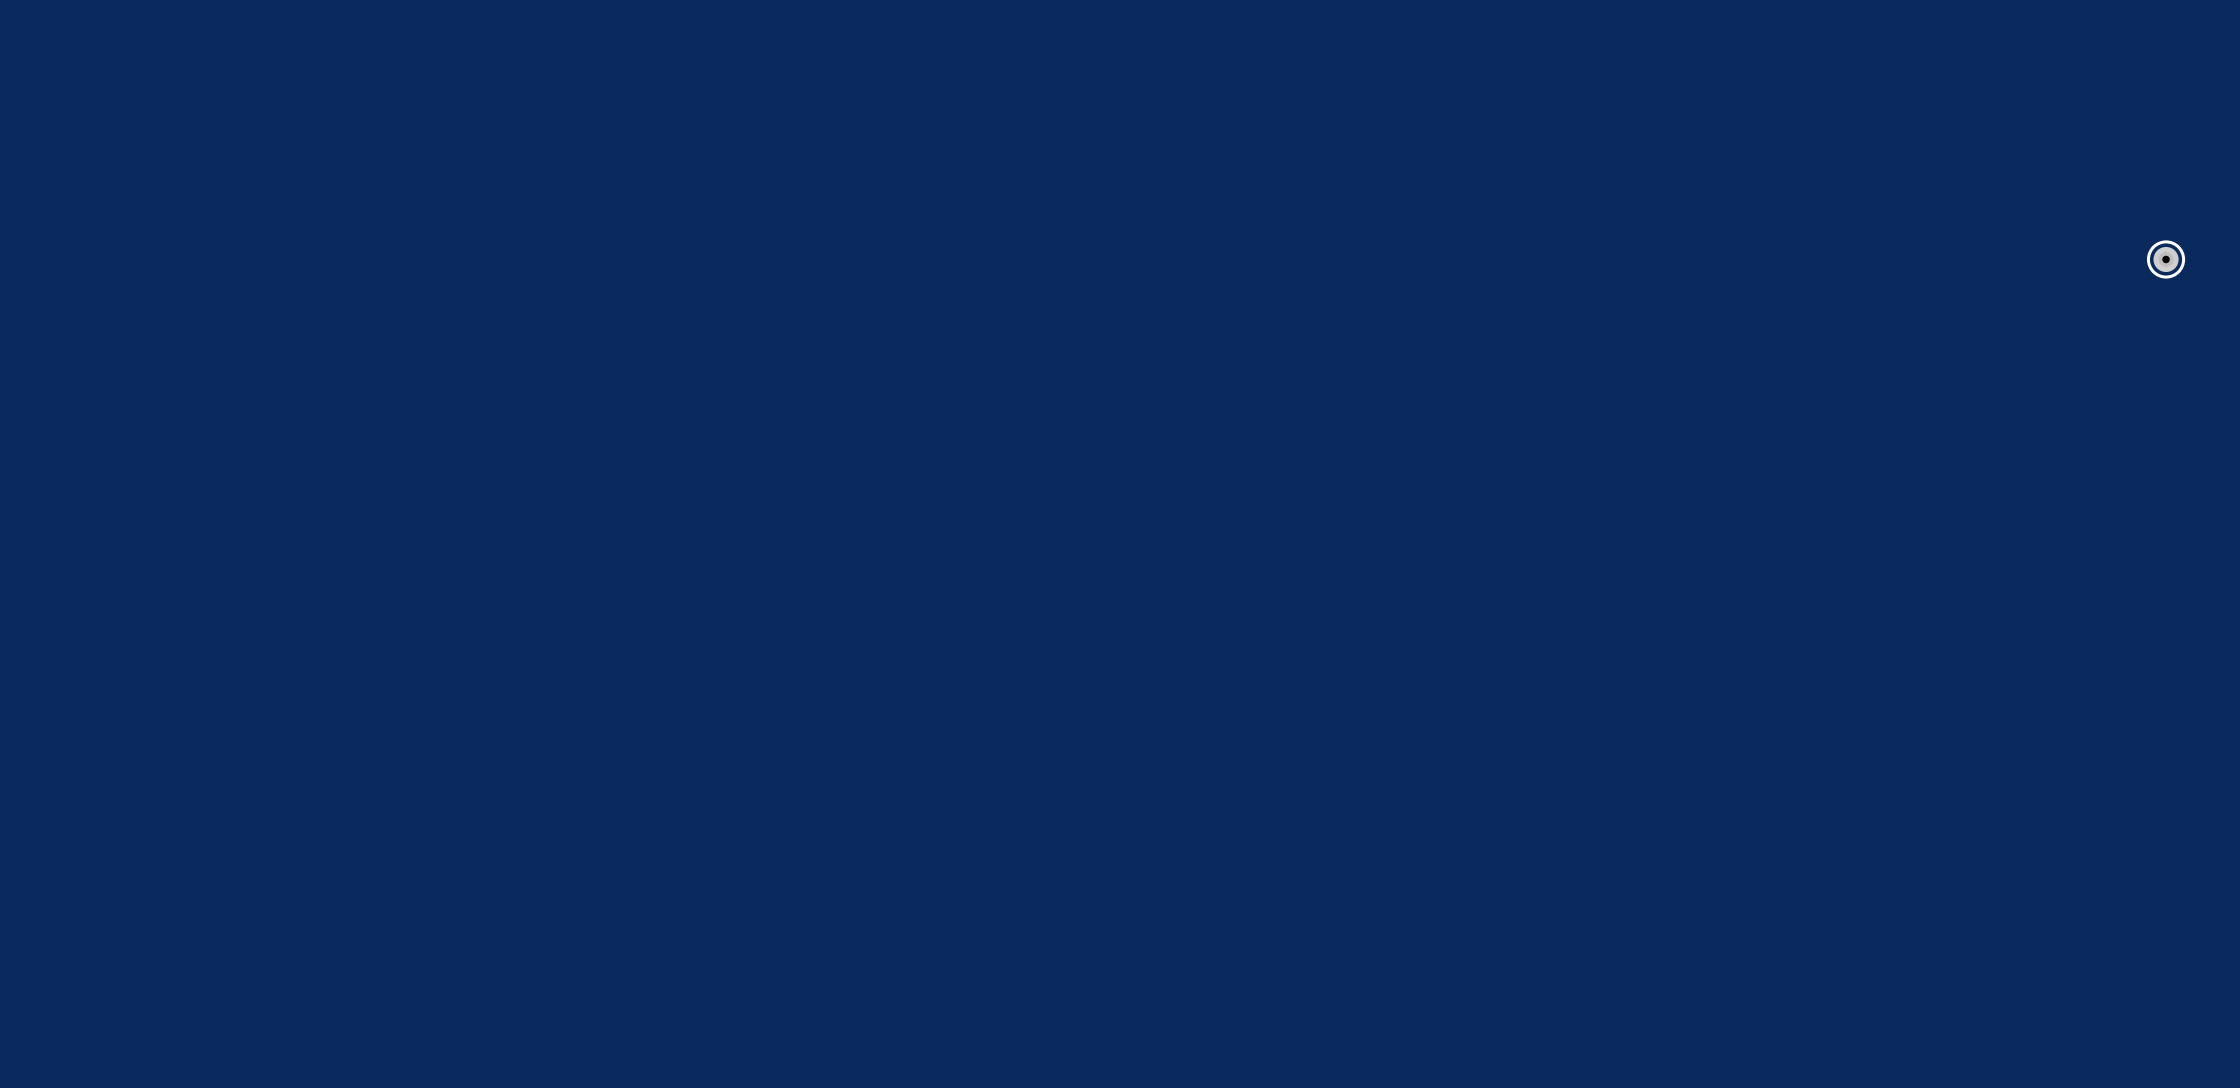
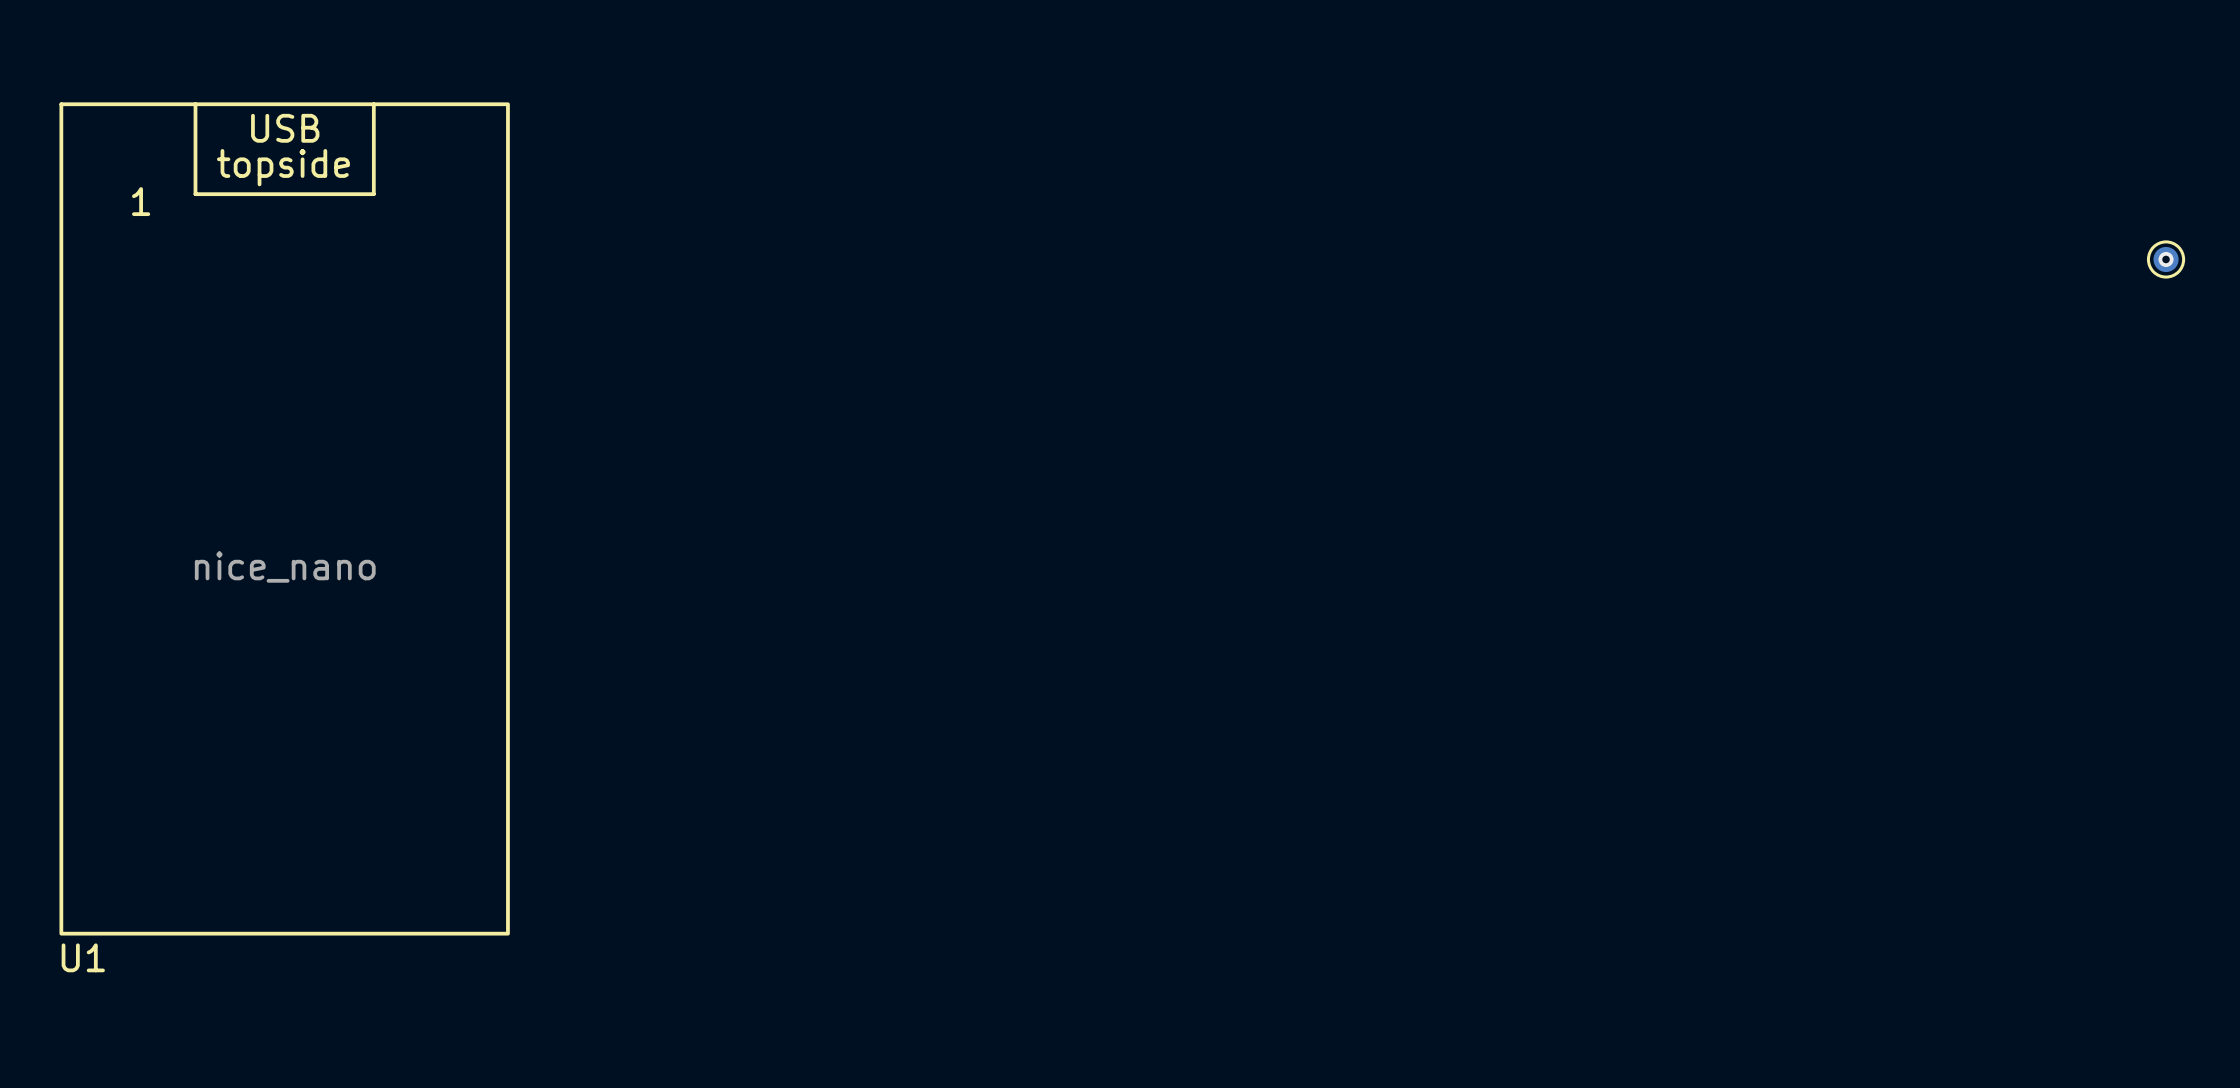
U1: none -> nice_nano (284, 518)

